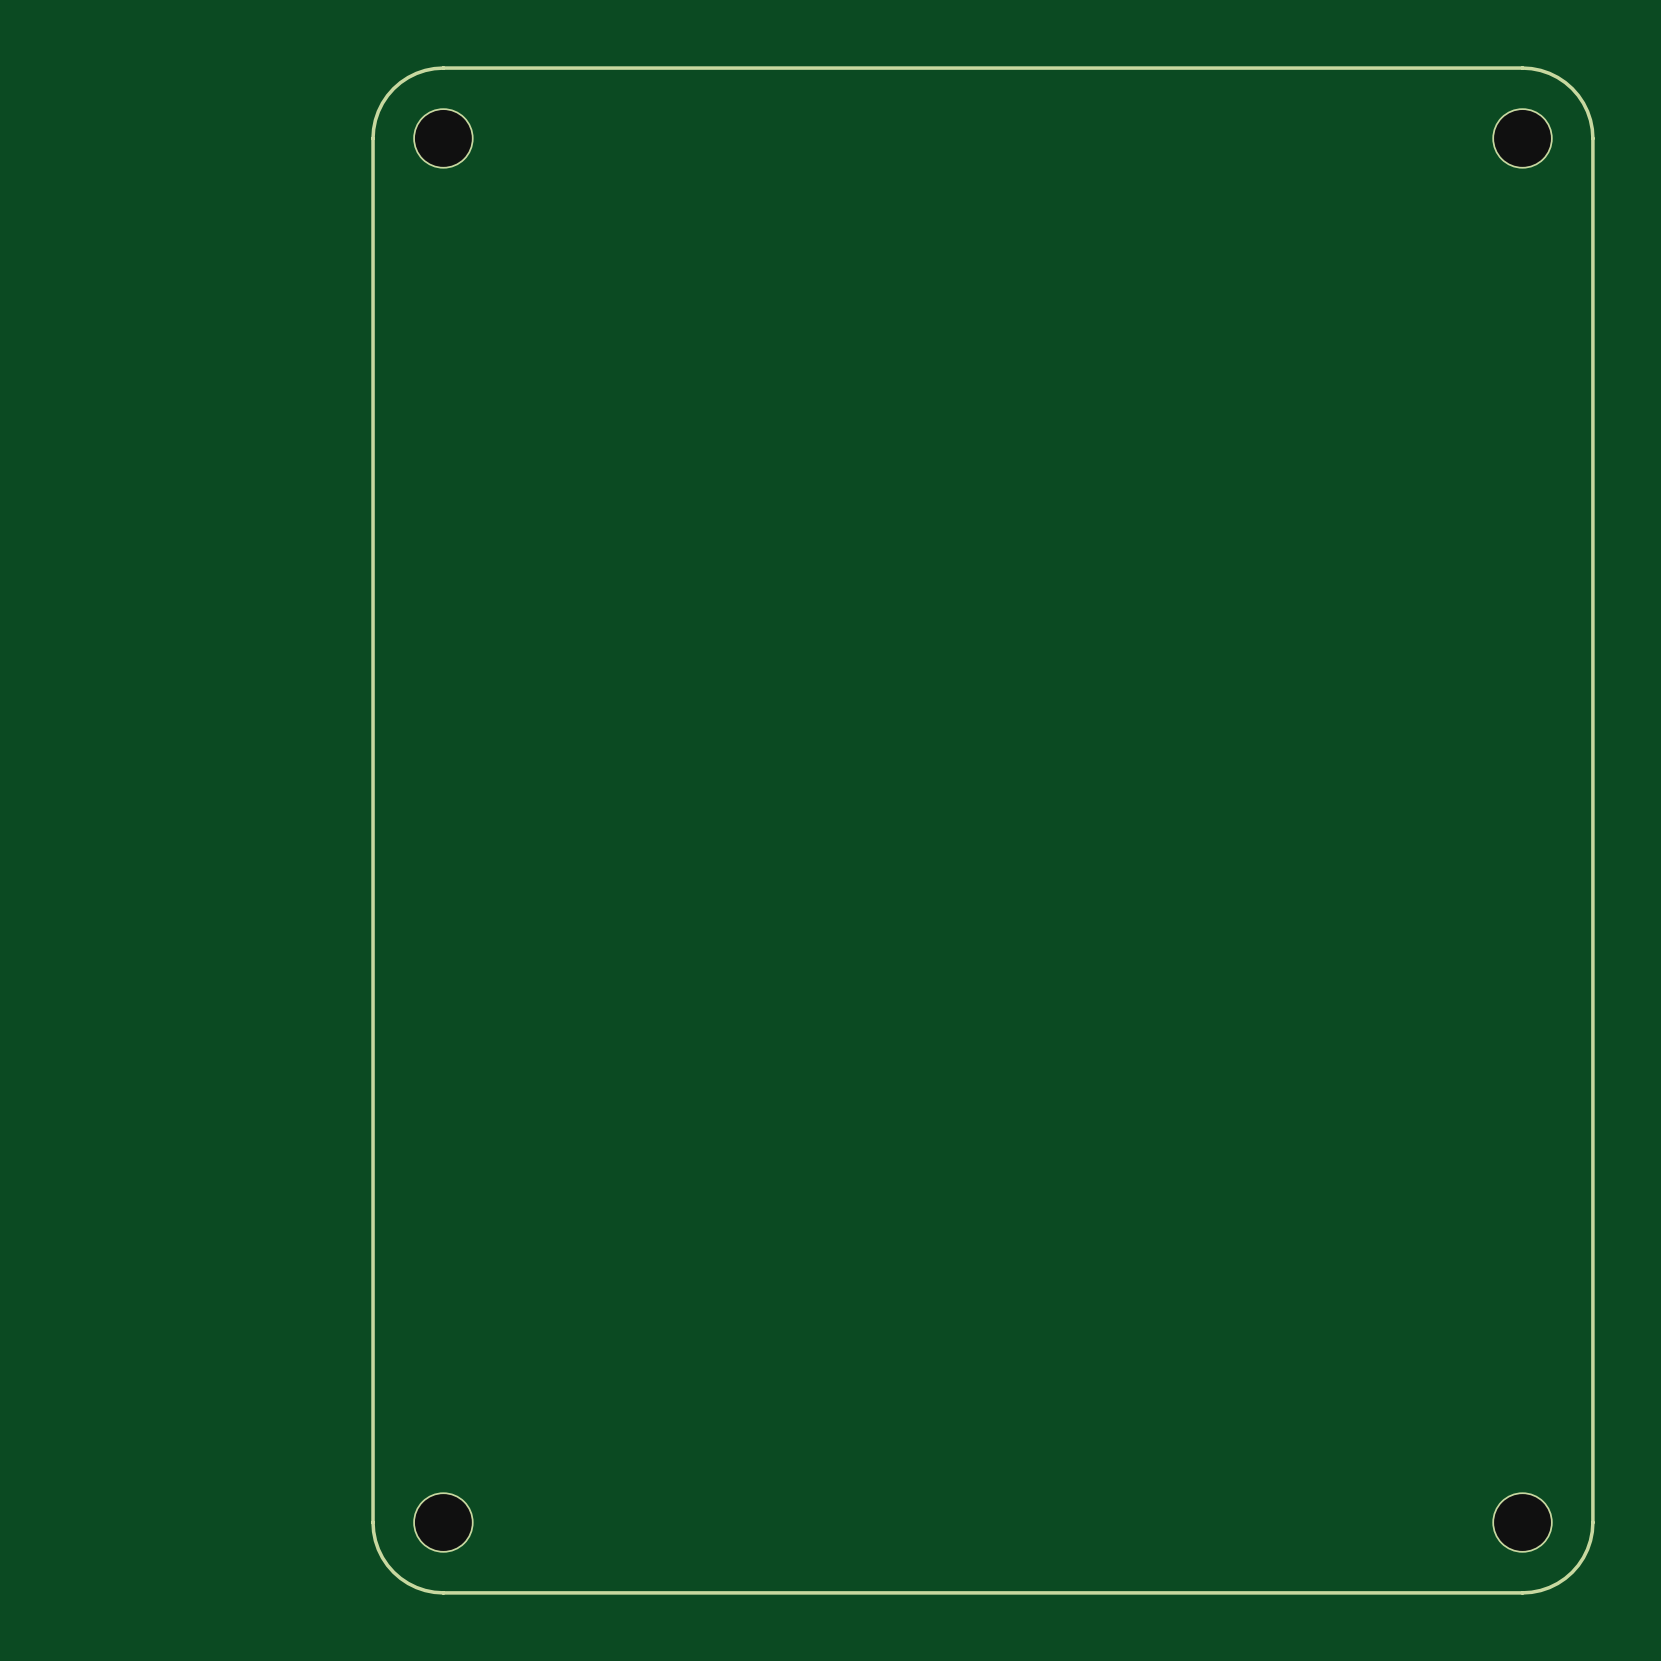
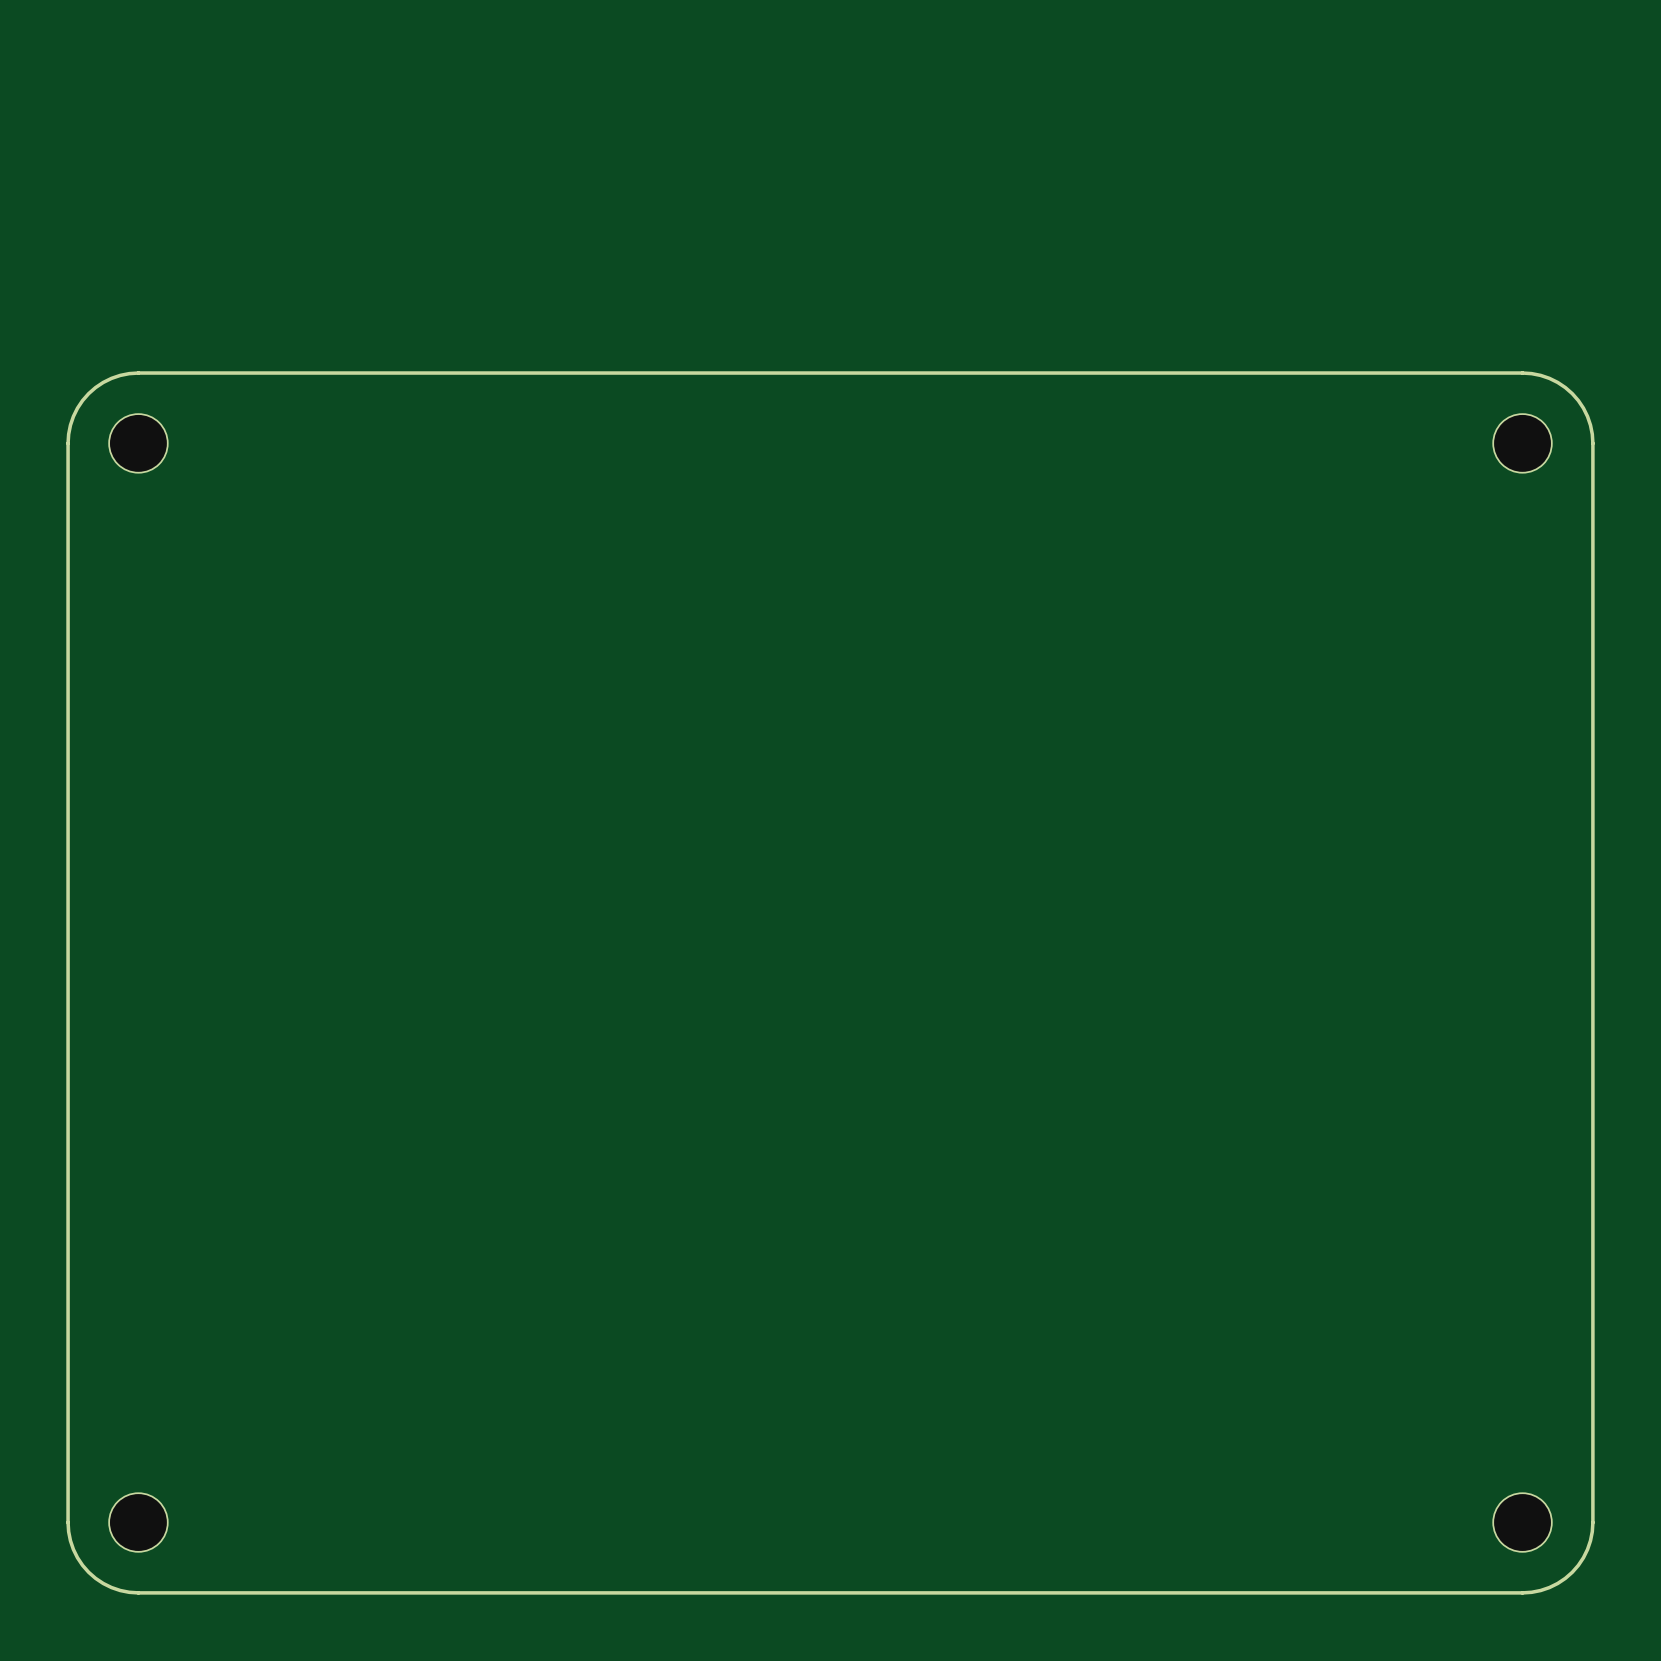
part position: (443, 138) -> (138, 443)
part position: (1522, 138) -> (1522, 443)
board edge: (1592, 443) (1592, 129) (1587, 111) (1572, 88) (1557, 77) (1540, 70) (1522, 68) (443, 68) (416, 73) (393, 88) (378, 111) (373, 138) (373, 1522) (378, 1549) (393, 1572) (416, 1587) (443, 1592) -> (1592, 443) (1587, 416) (1572, 393) (1549, 378) (1522, 373) (138, 373) (111, 378) (88, 393) (73, 416) (68, 443) (68, 1522) (70, 1540) (82, 1565) (95, 1578) (111, 1587) (129, 1592) (443, 1592)
part position: (443, 1522) -> (138, 1522)

